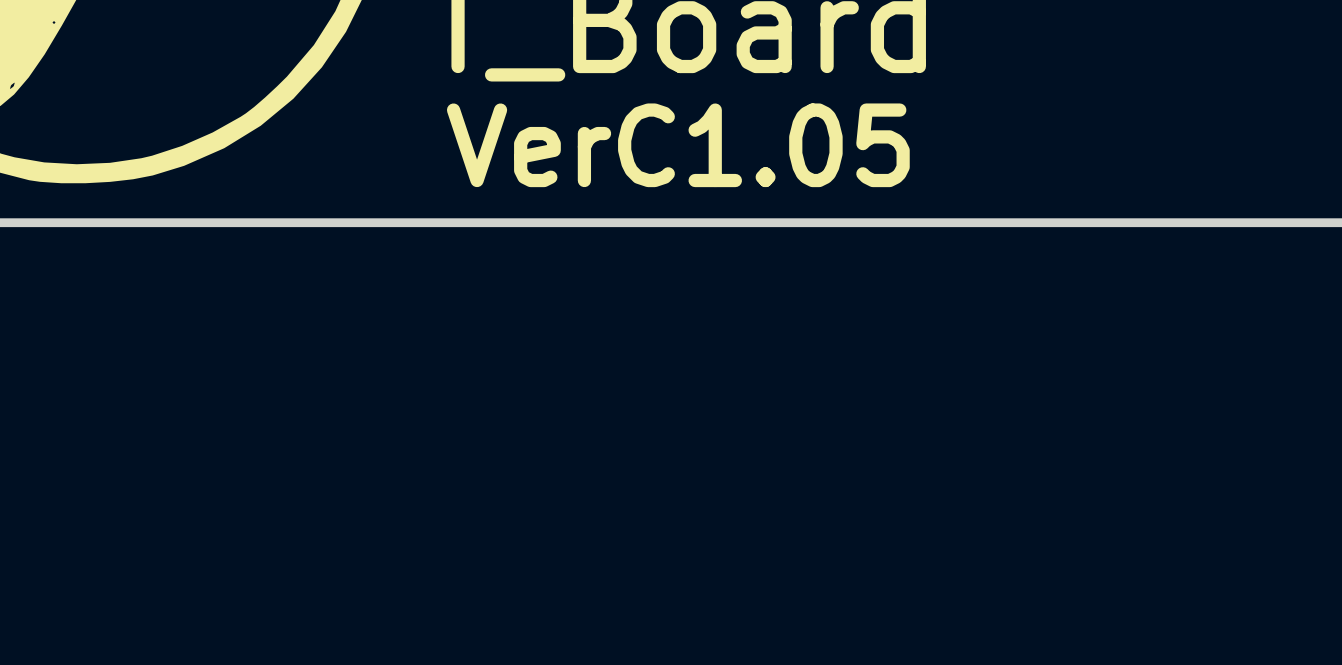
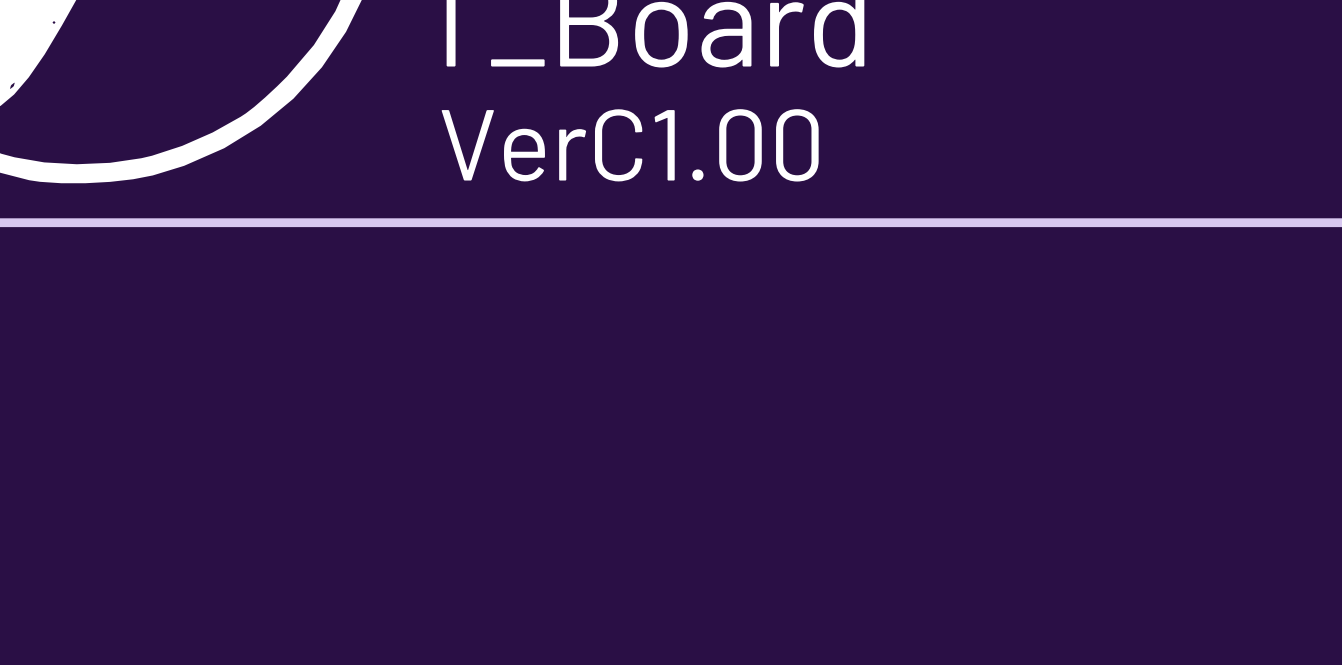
text: VerC1.05 (678, 145) -> VerC1.00 (630, 145)

